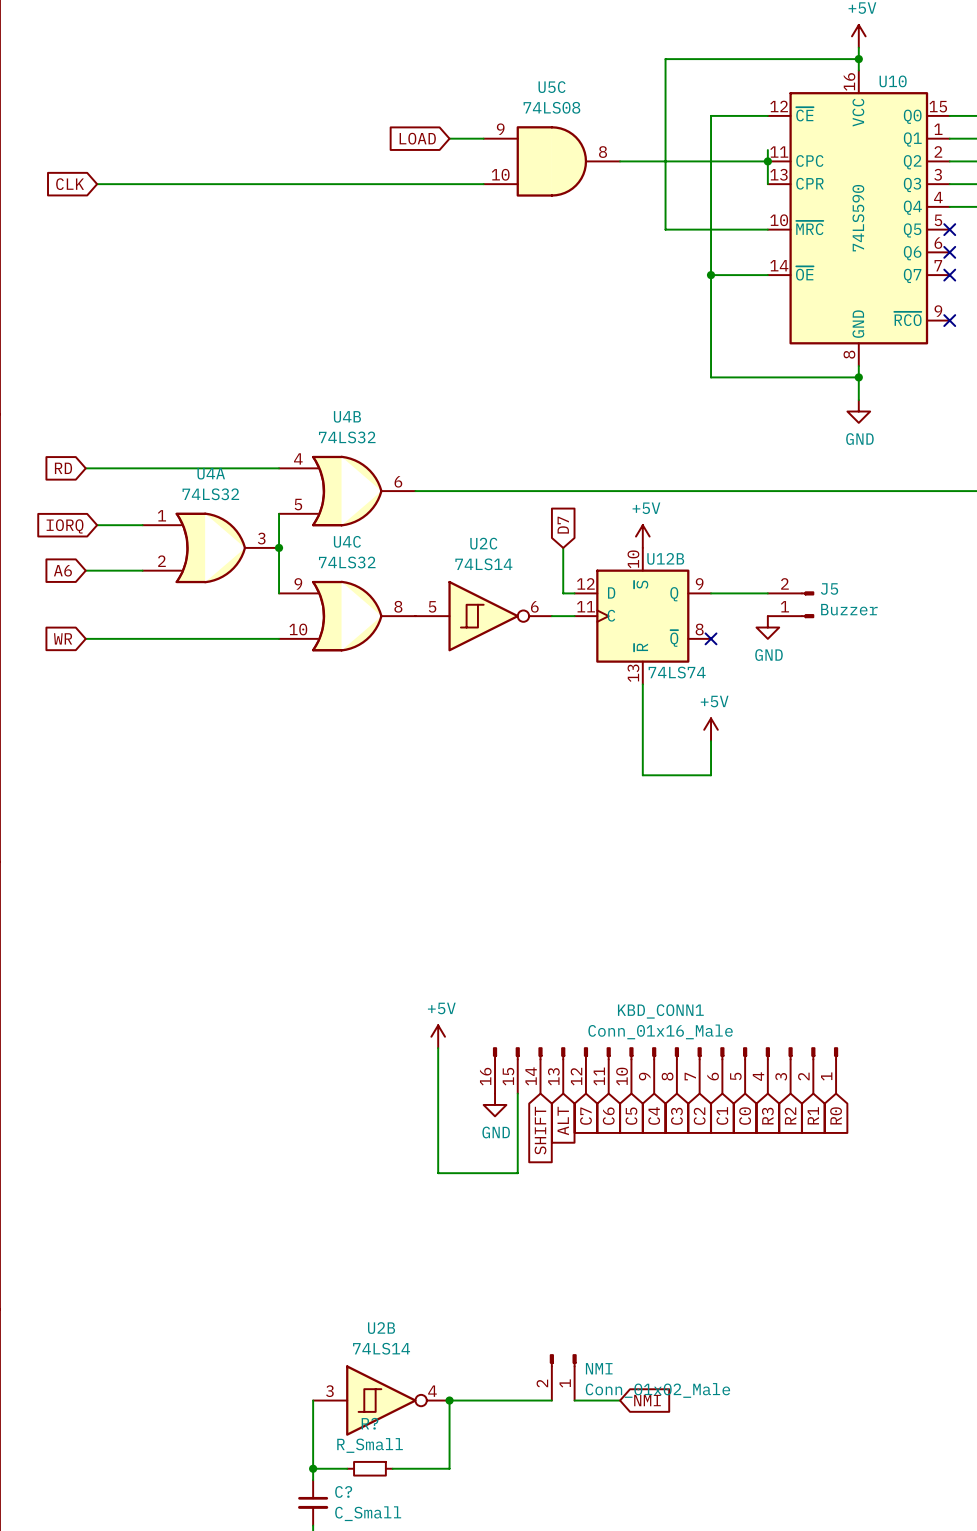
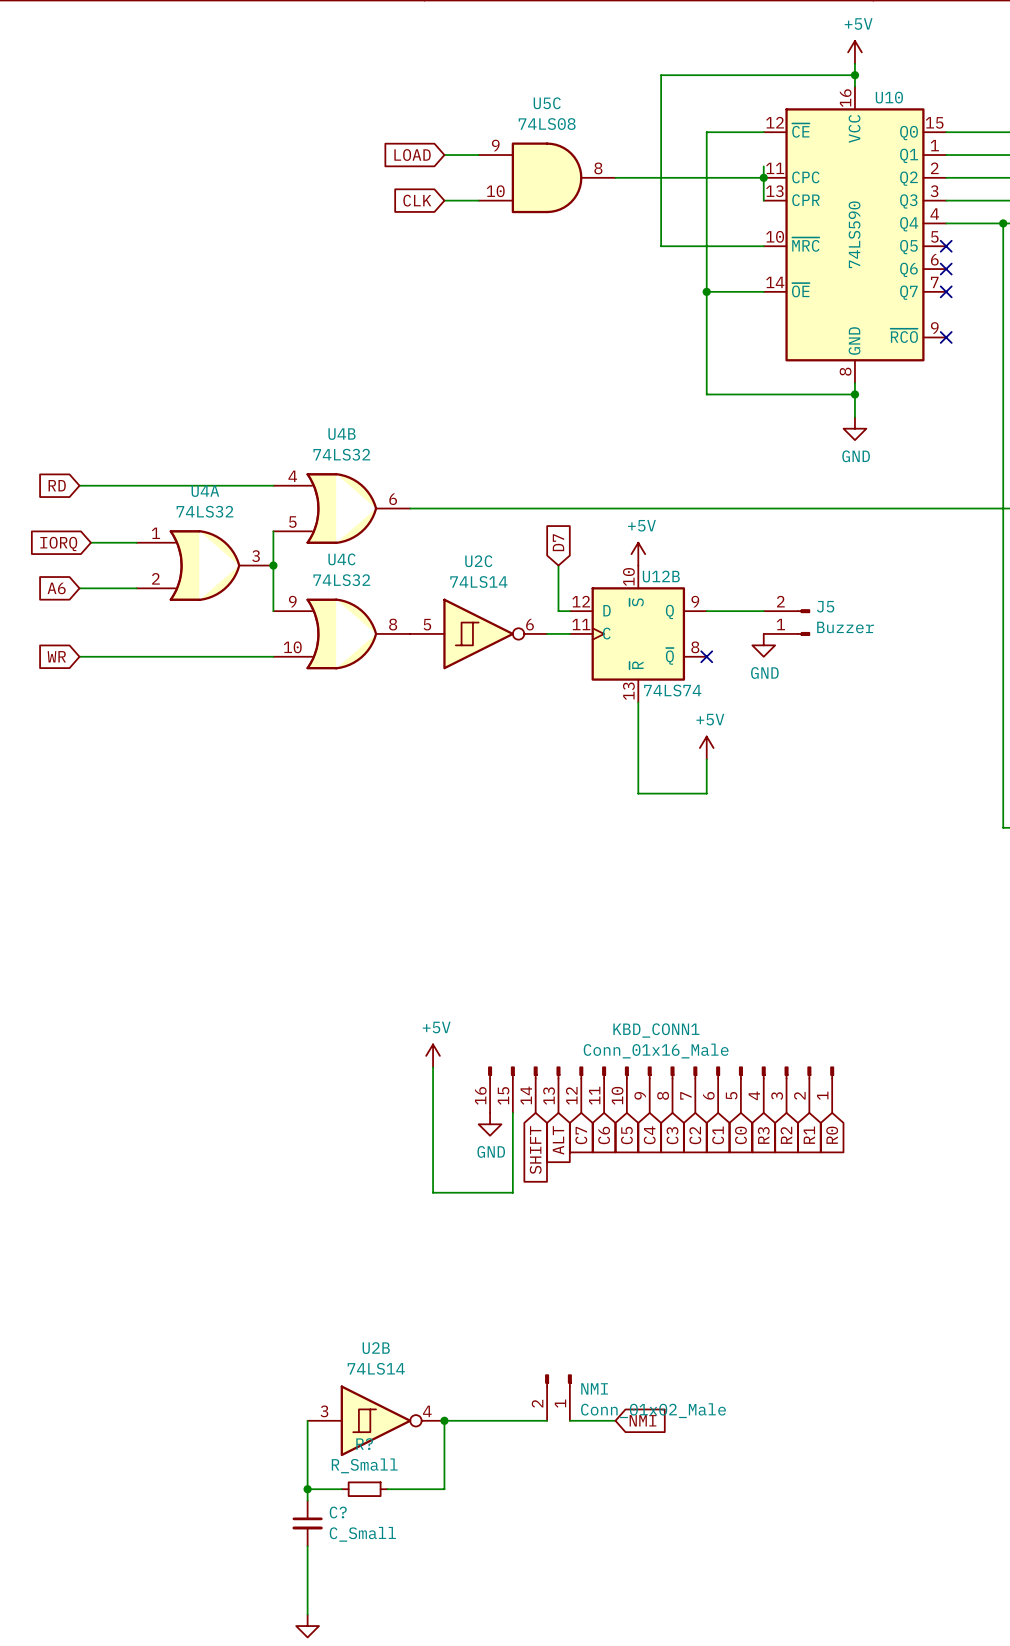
global label: CLK (70, 184) -> none
wire: (97, 184) (449, 184) -> none
global label: none -> CLK (417, 200)

